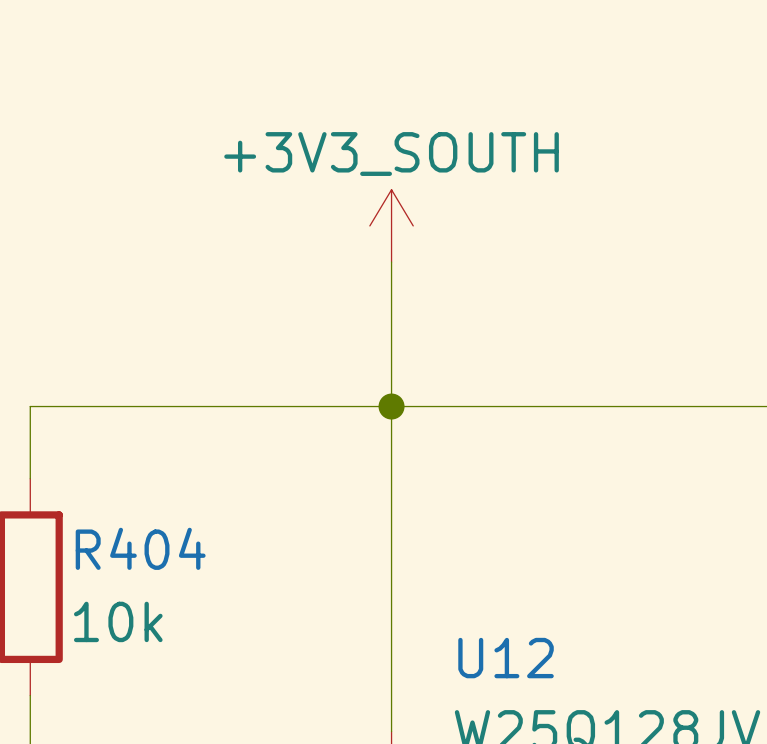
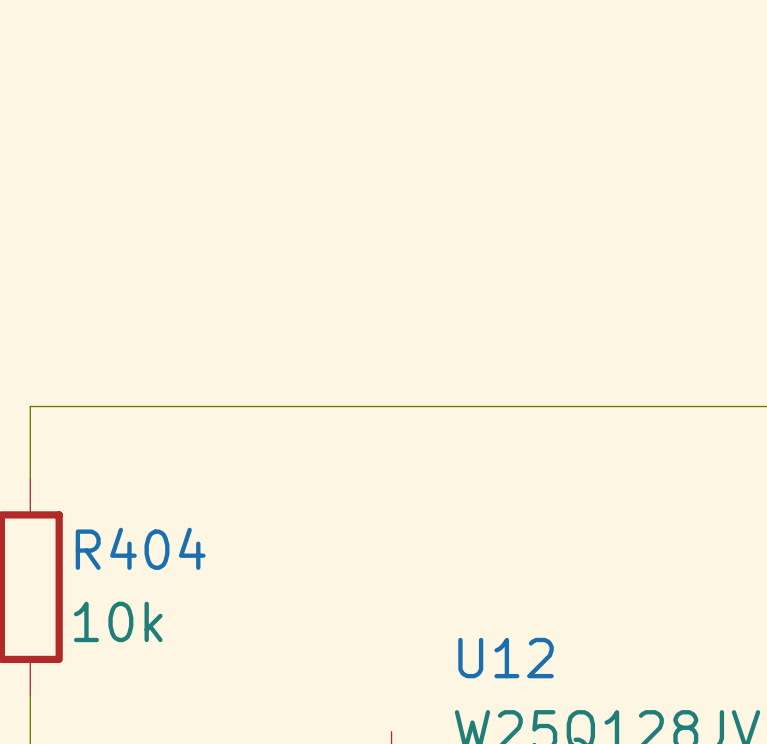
power symbol: +3V3_SOUTH (391, 225) -> none
wire: (391, 262) (391, 731) -> none
junction: (391, 406) -> none

